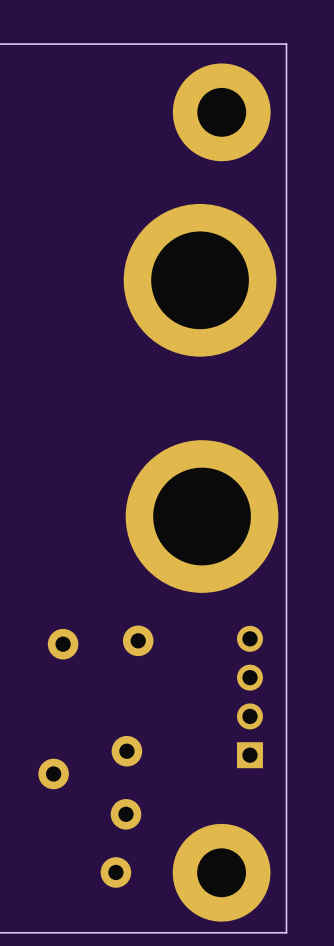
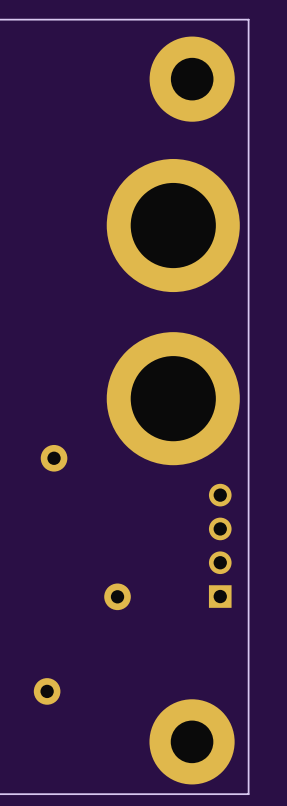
part position: (202, 516) -> (173, 398)
part: none -> (54, 458)
part: (138, 640) -> none
part: (63, 644) -> none
part position: (249, 697) -> (220, 545)
part: none -> (117, 596)
part: (126, 751) -> none
part: (53, 773) -> none
part: none -> (47, 691)
part: (125, 814) -> none
part: (115, 872) -> none

